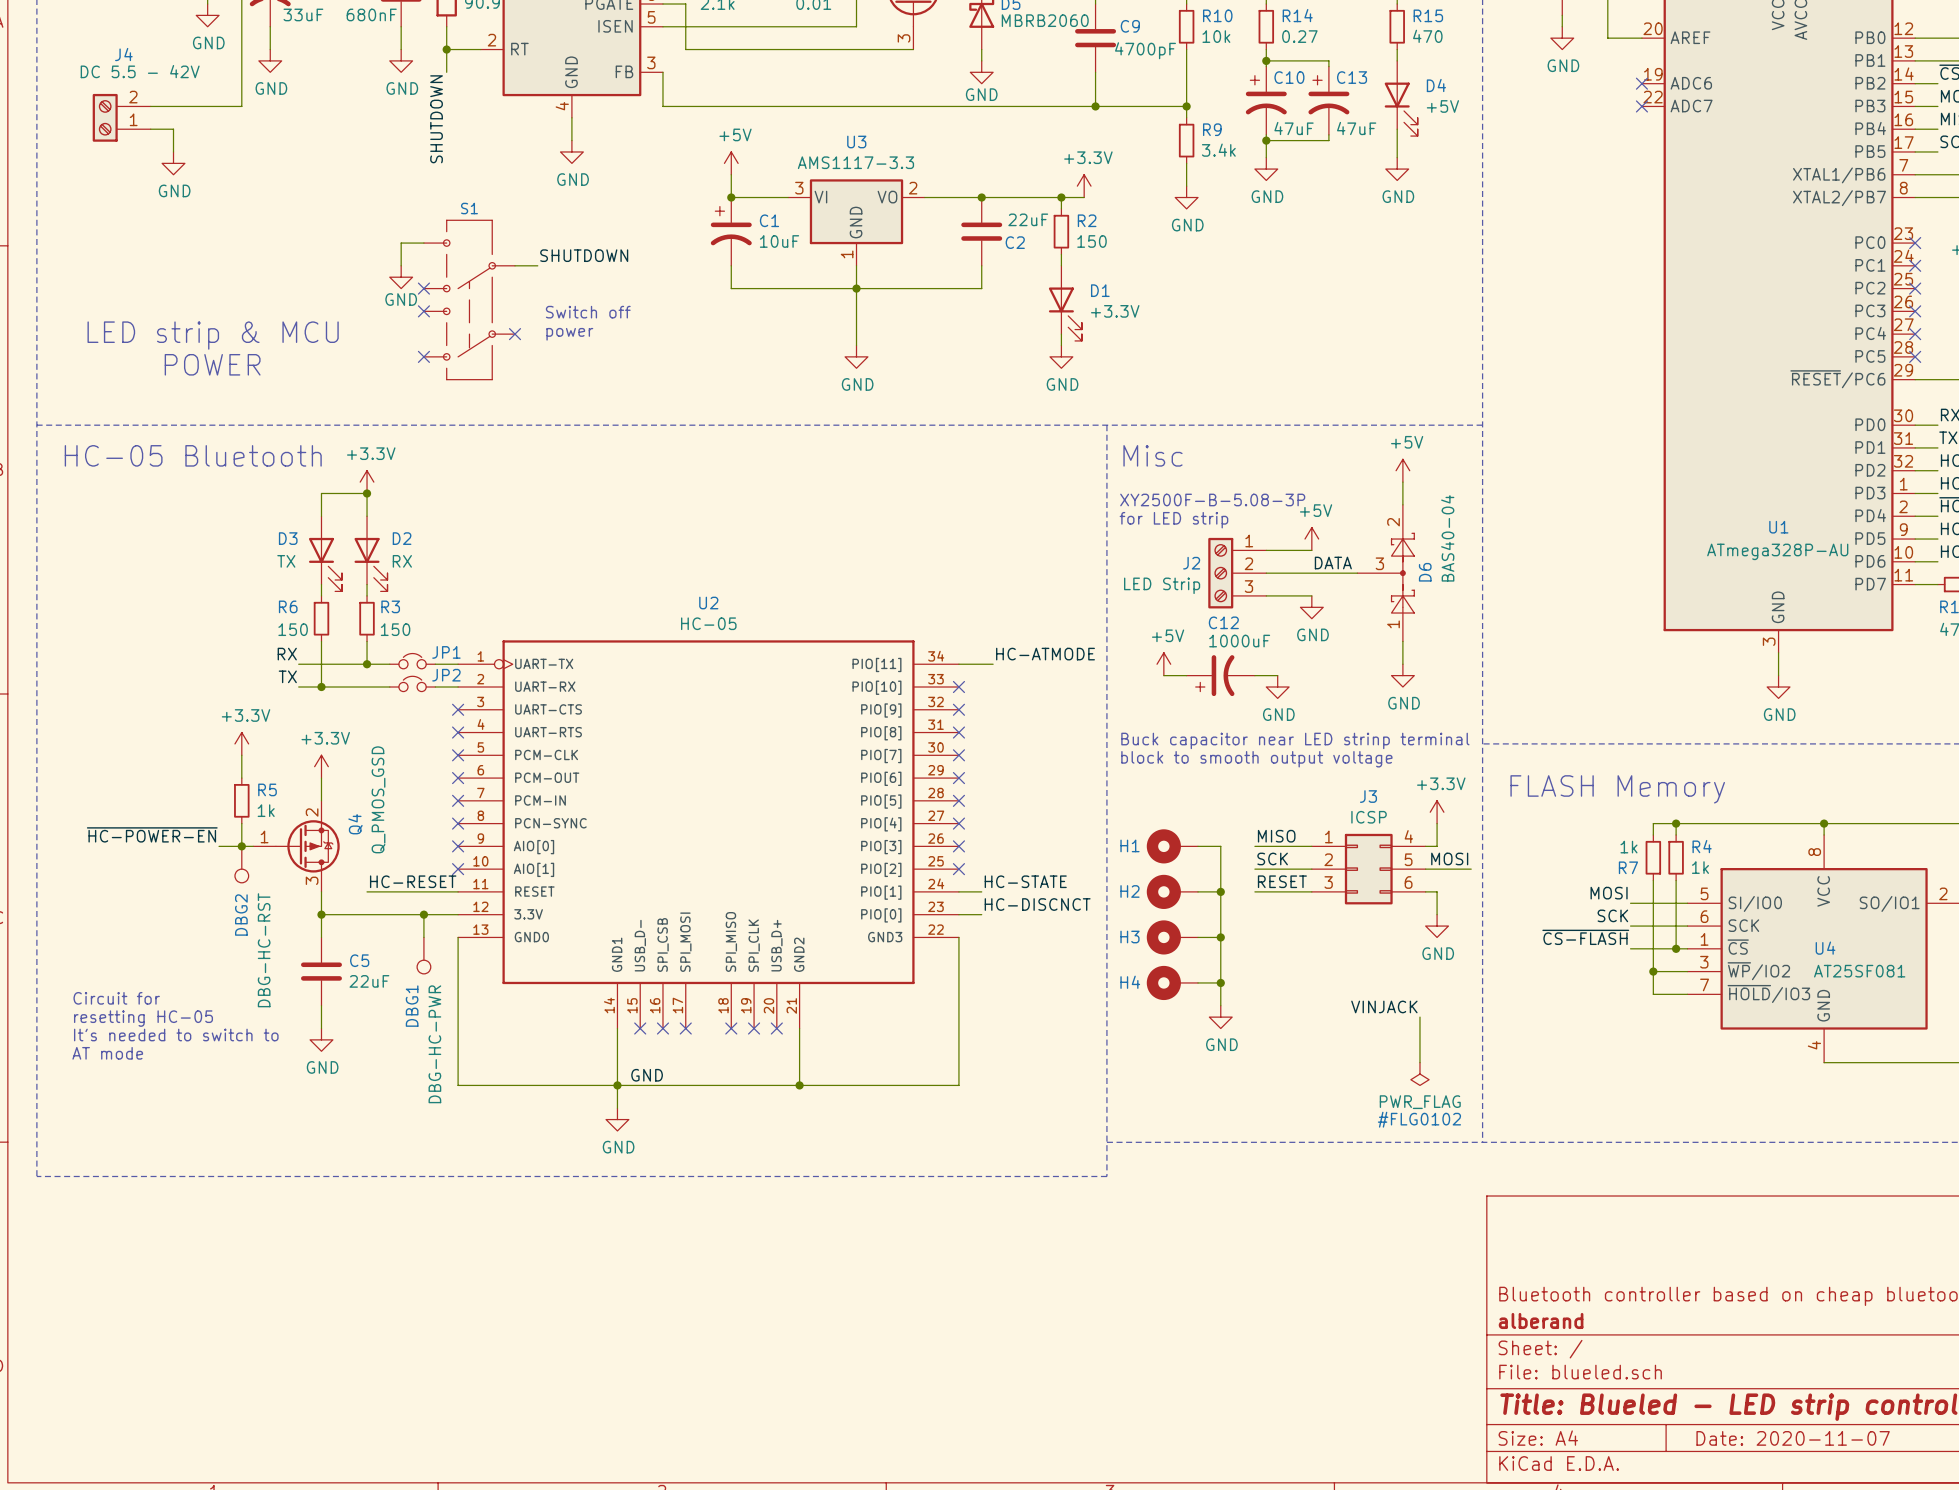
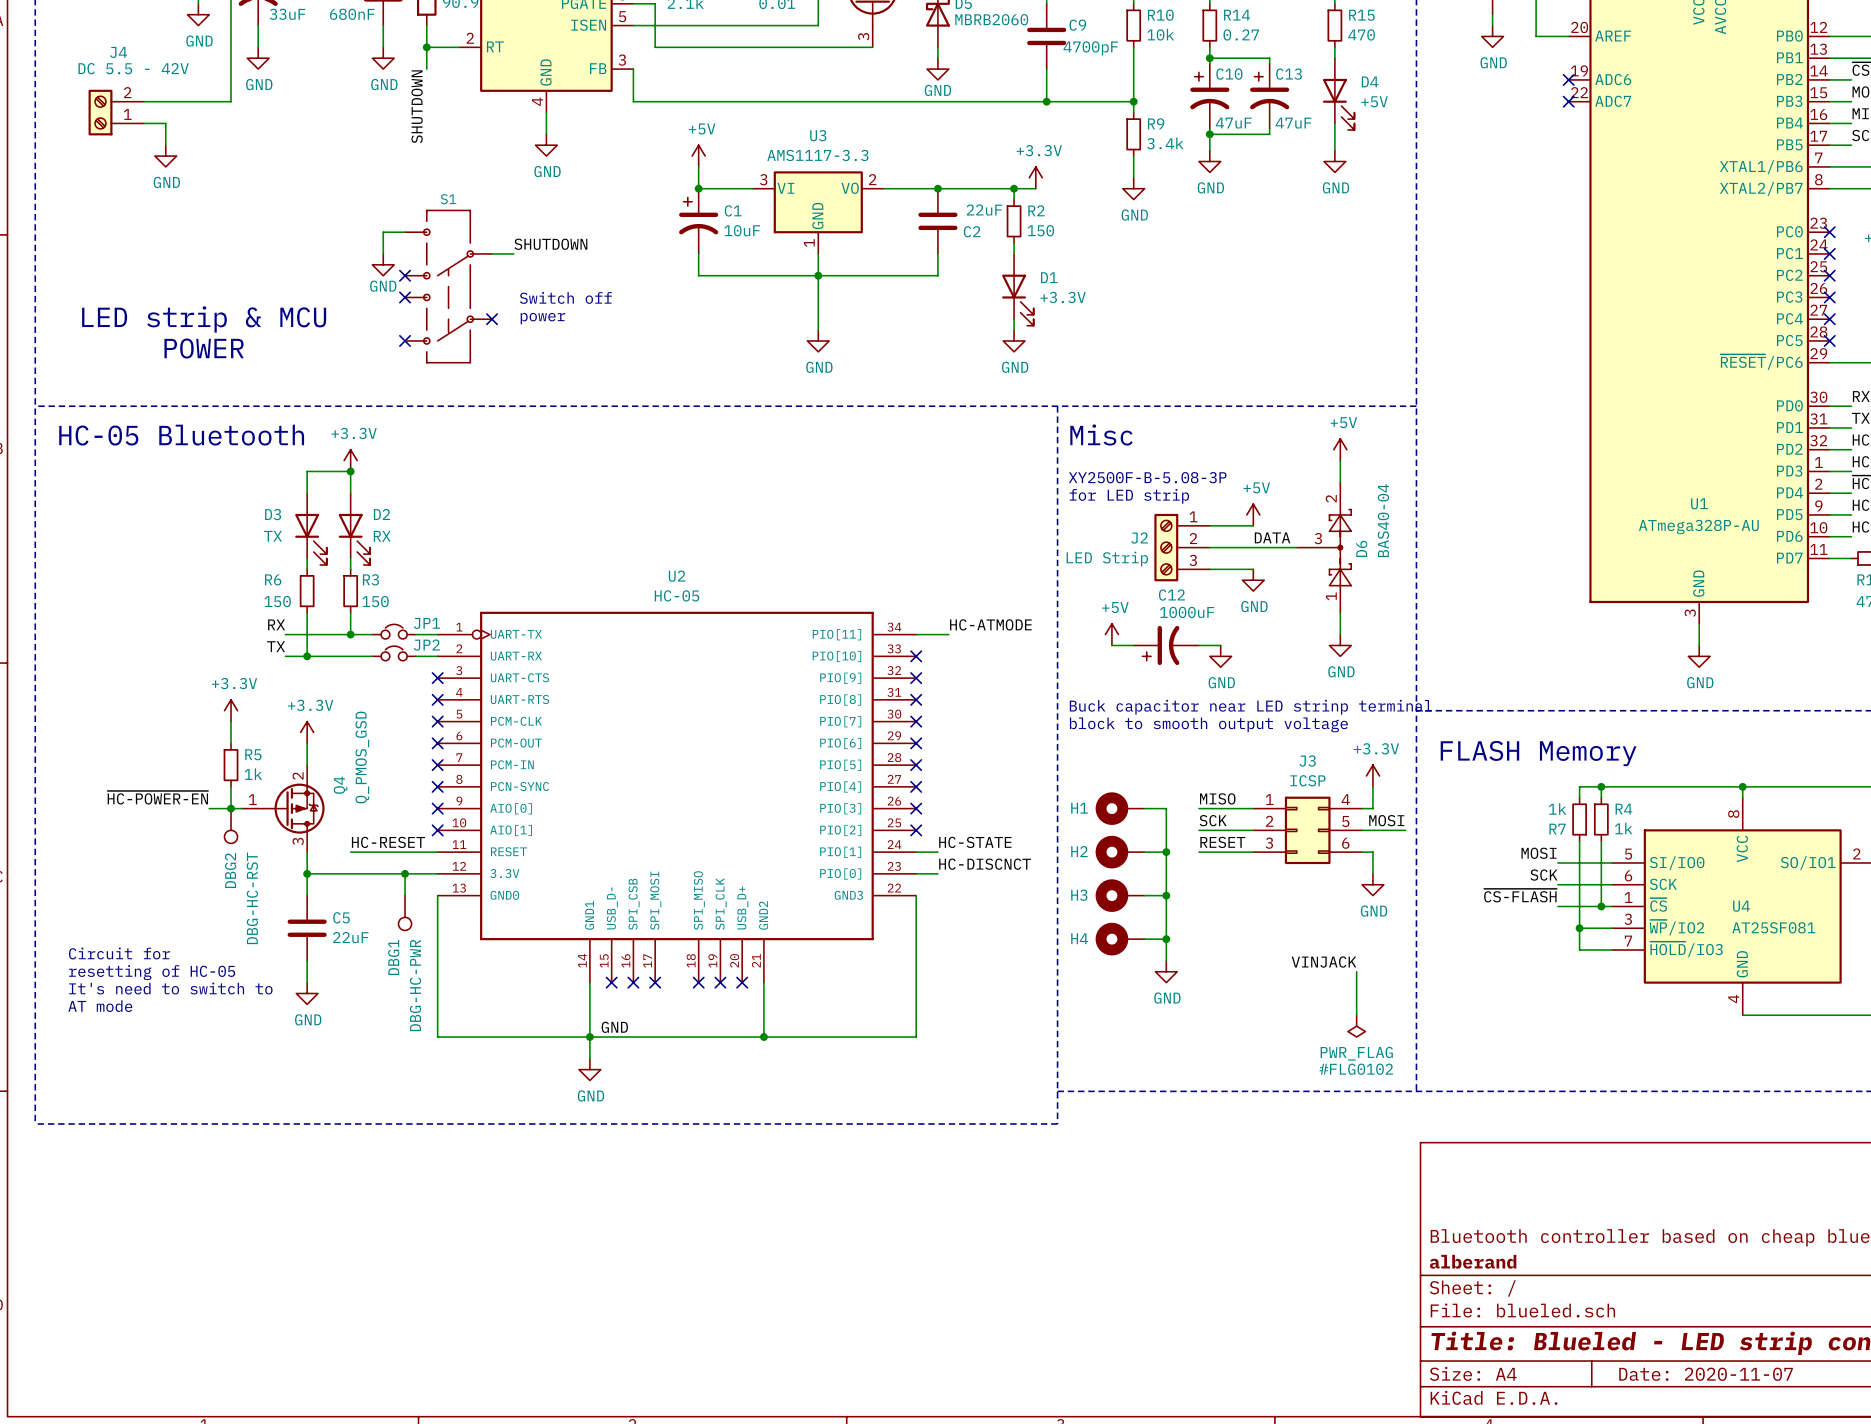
text: resetting HC-05 (143, 1018) -> resetting of HC-05 (152, 972)
text: It's needed to switch to (176, 1035) -> It's need to switch to (170, 988)

